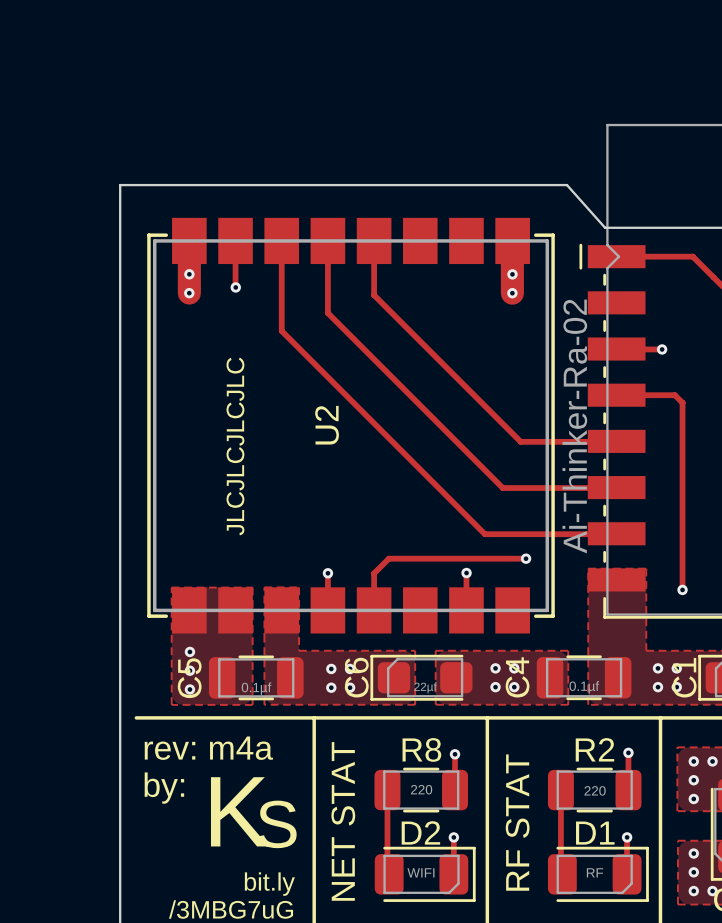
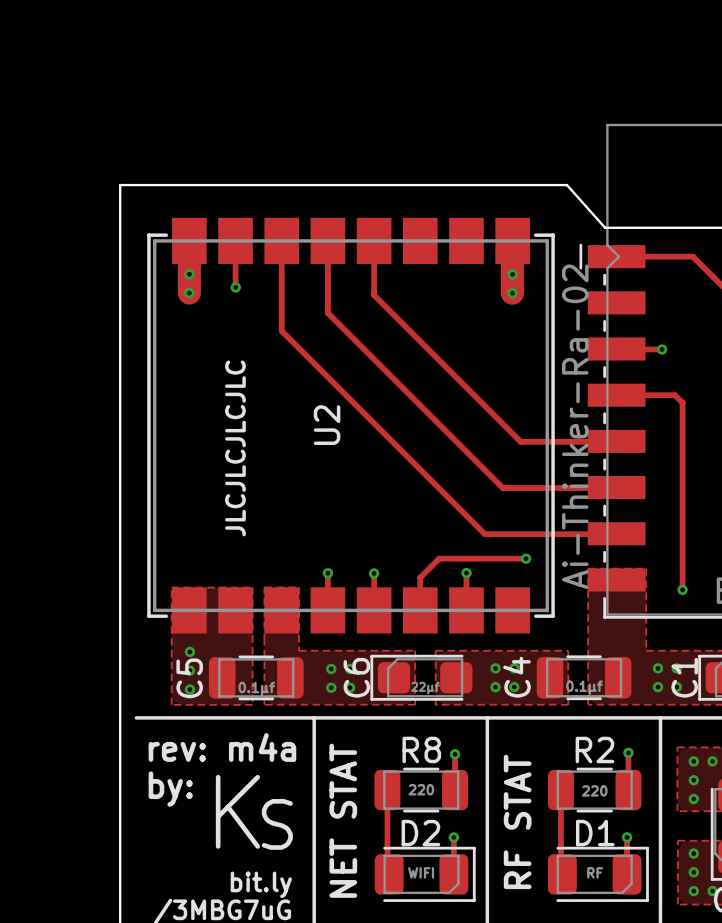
track: (439, 558) (388, 558) (374, 573) -> (439, 558) (420, 577) (420, 610)
via: none -> (374, 573)

